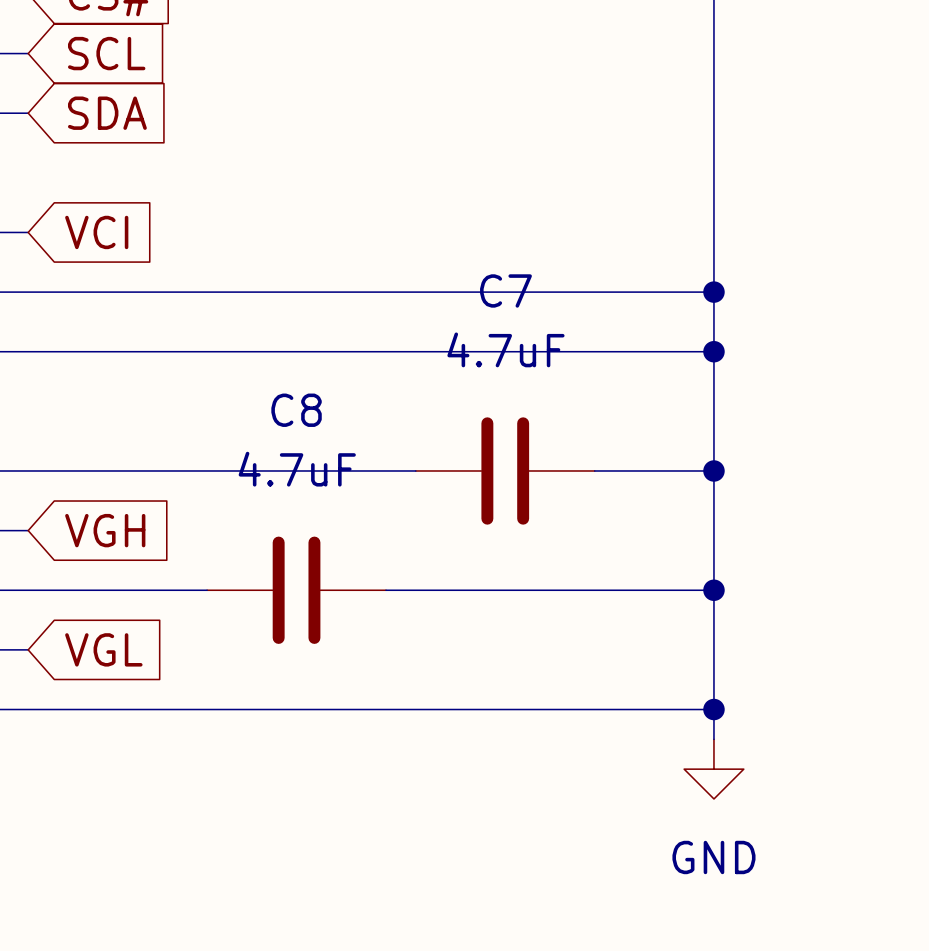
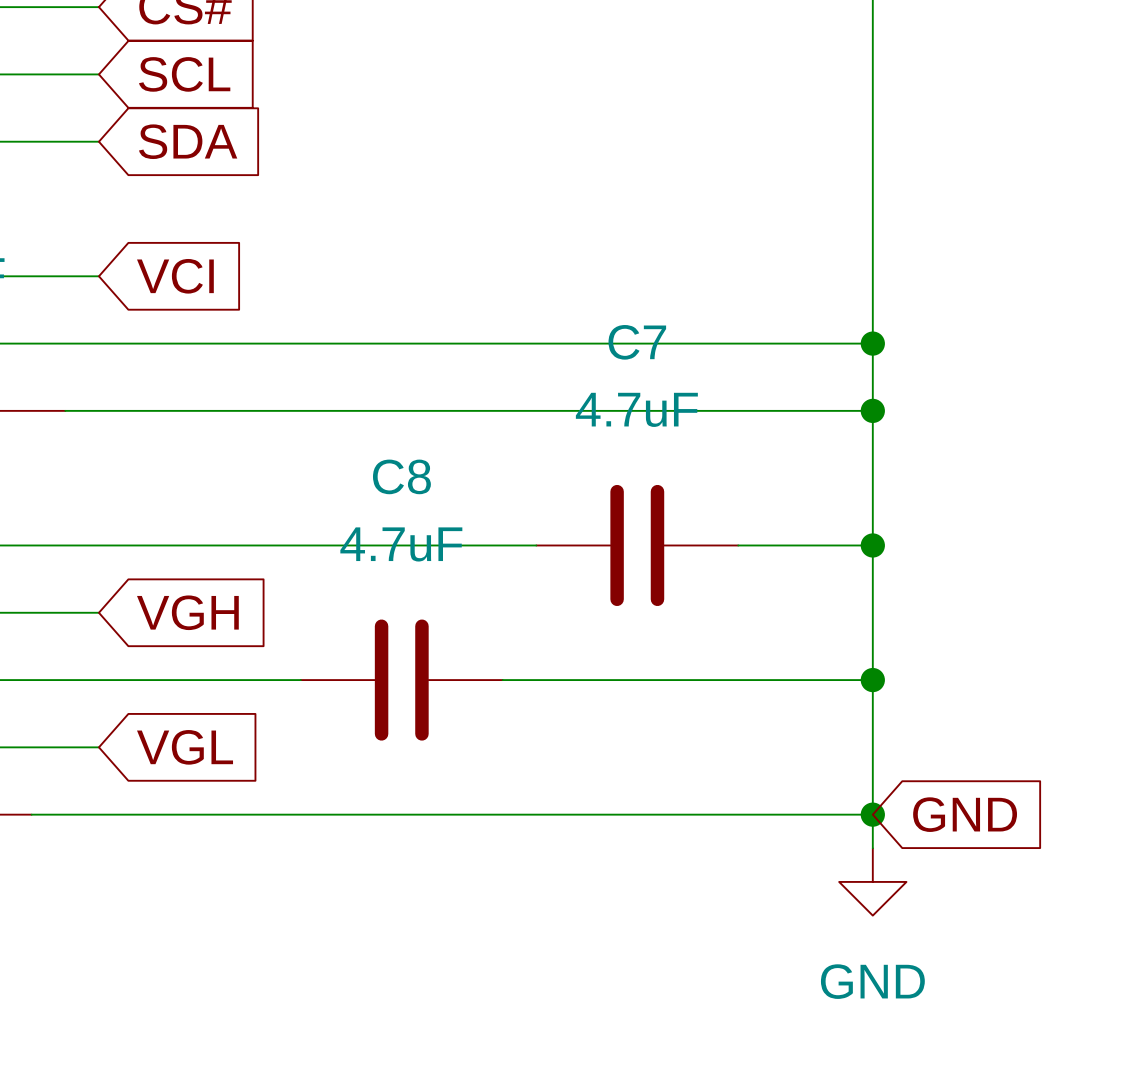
global label: none -> GND (965, 814)

